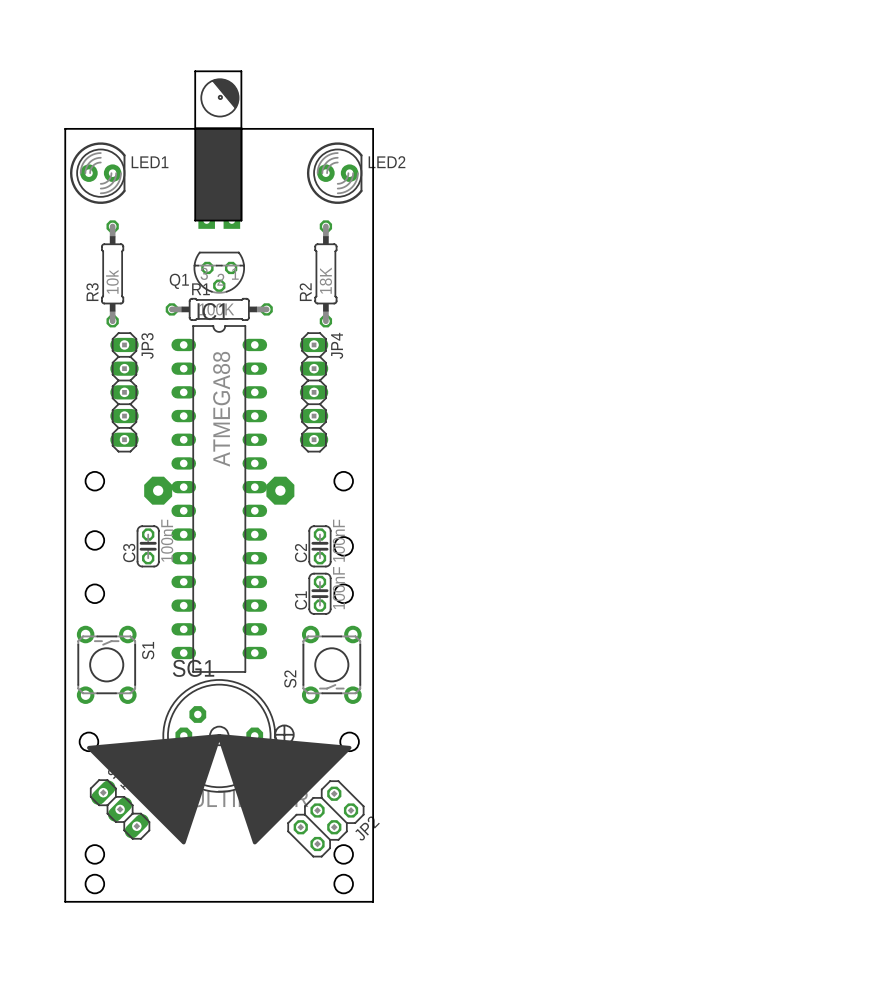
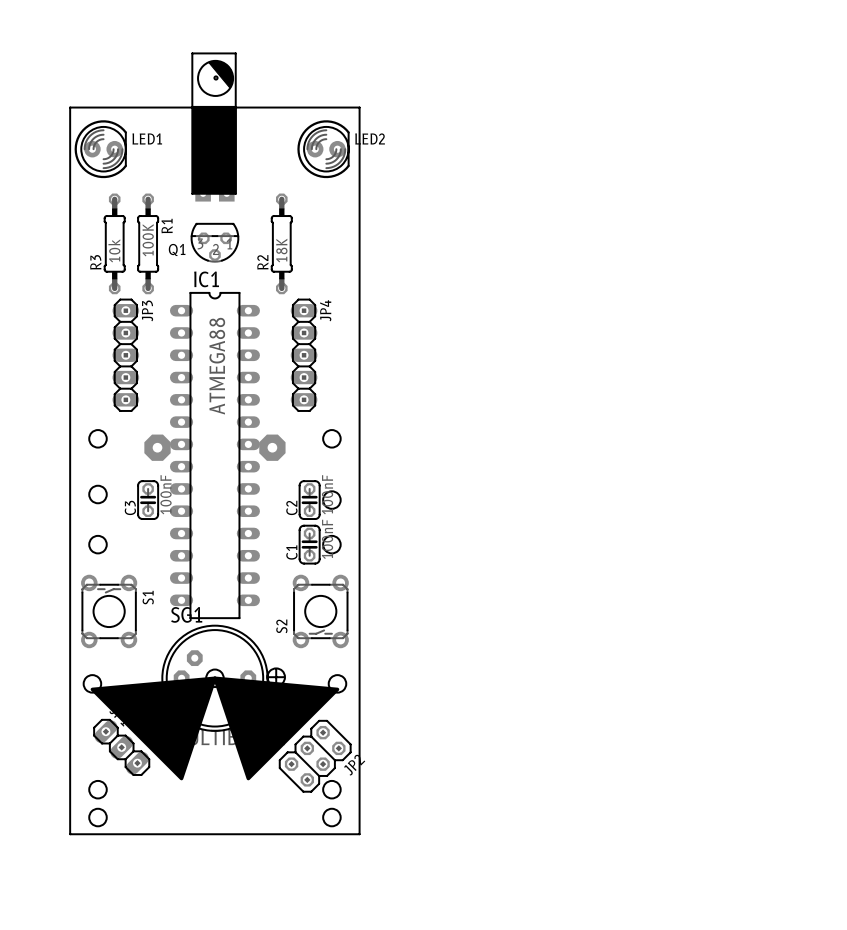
R2 position: (325, 273) -> (281, 243)
R1 rotation: 0° (219, 309) -> 90° clockwise (148, 243)
R1 position: (219, 309) -> (148, 243)

